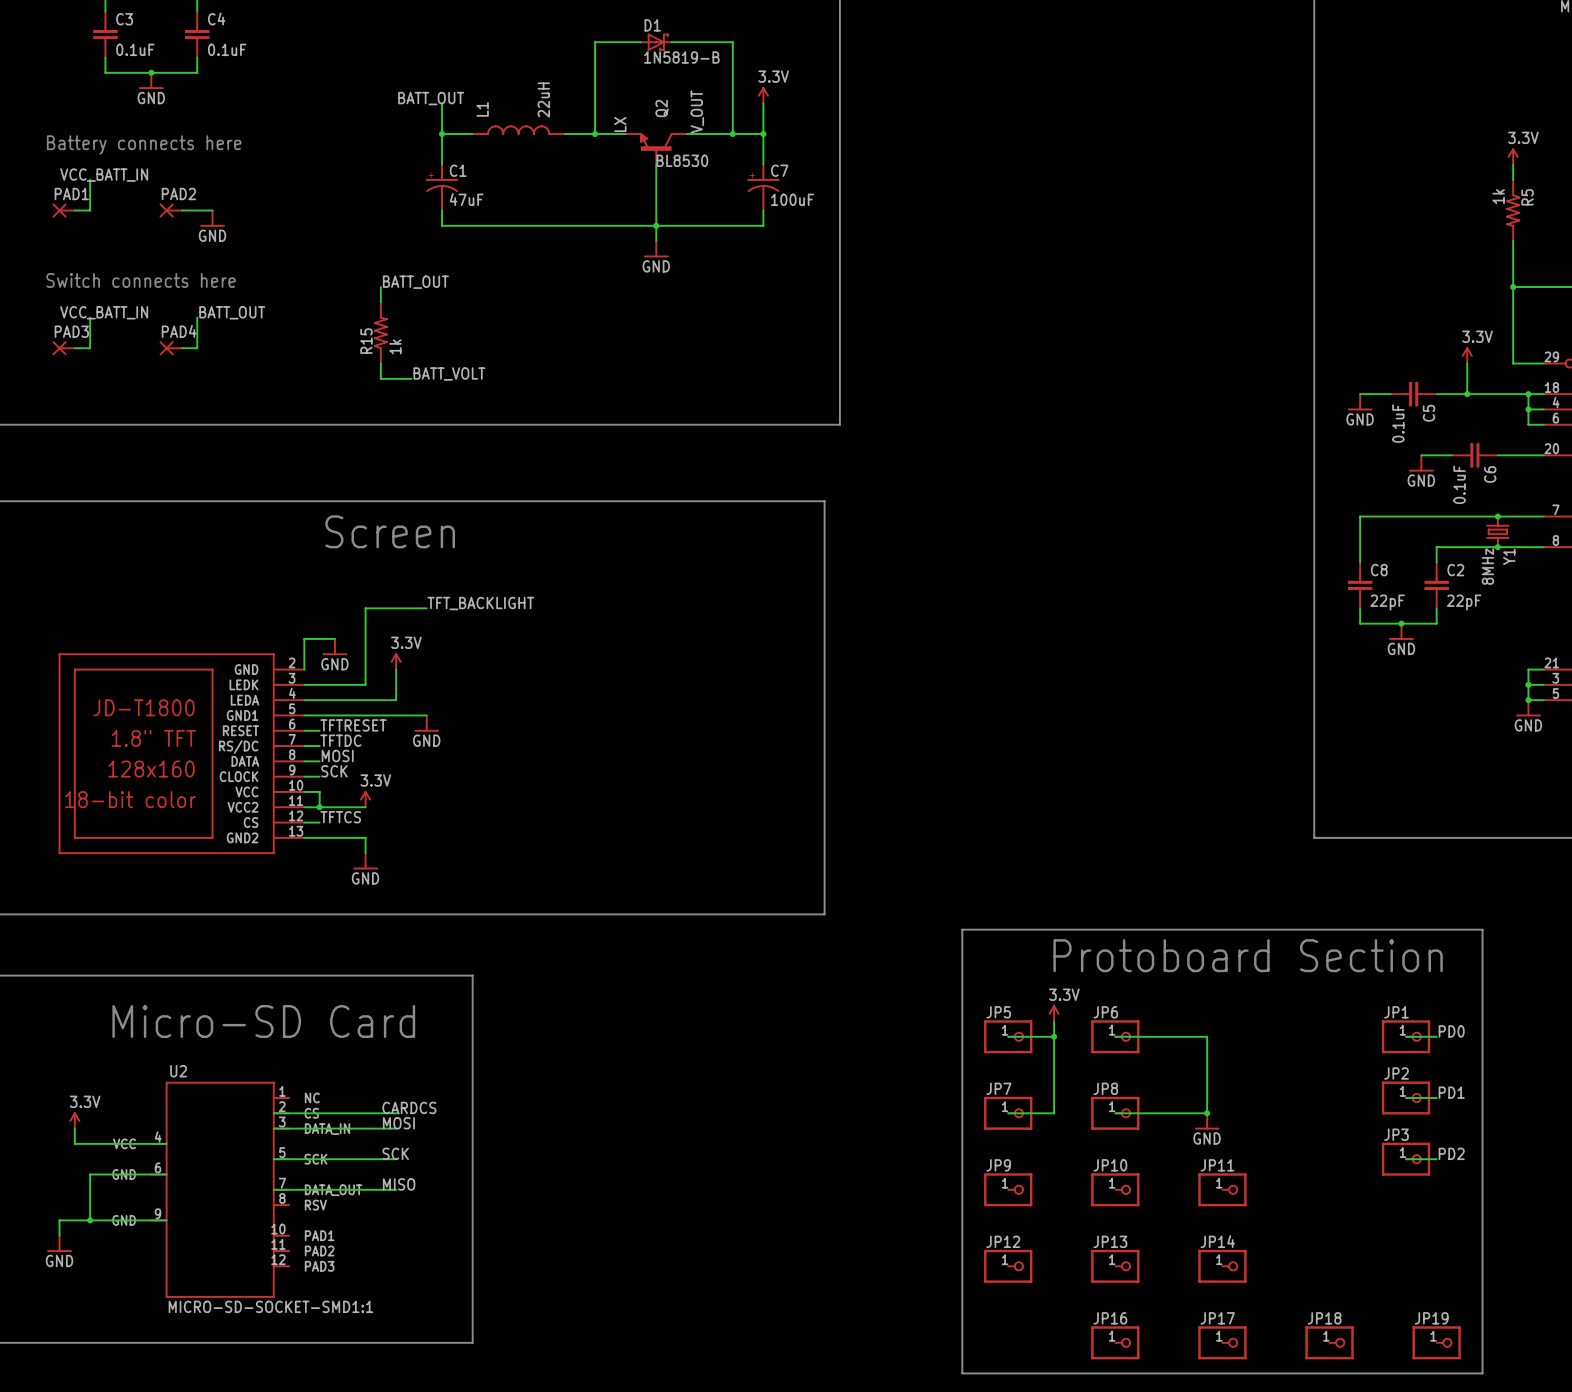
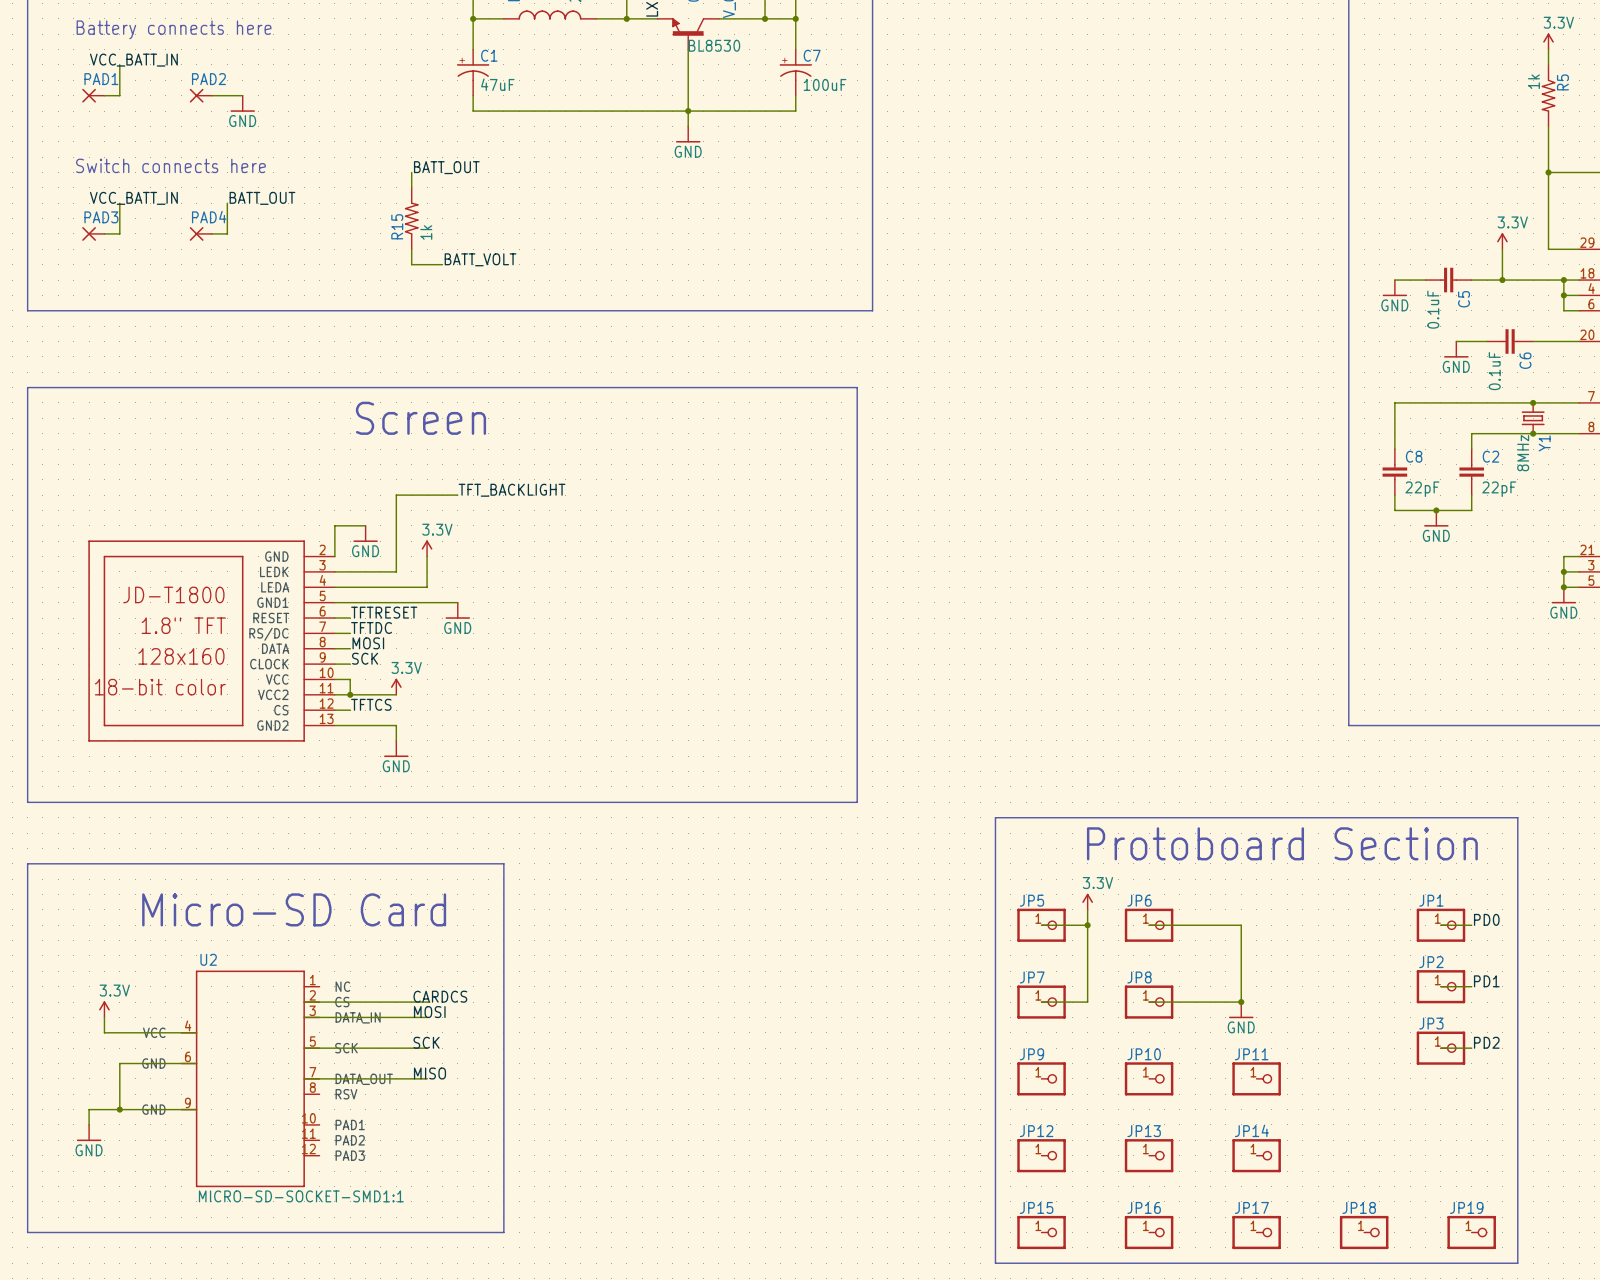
JP15: none -> (1041, 1232)

